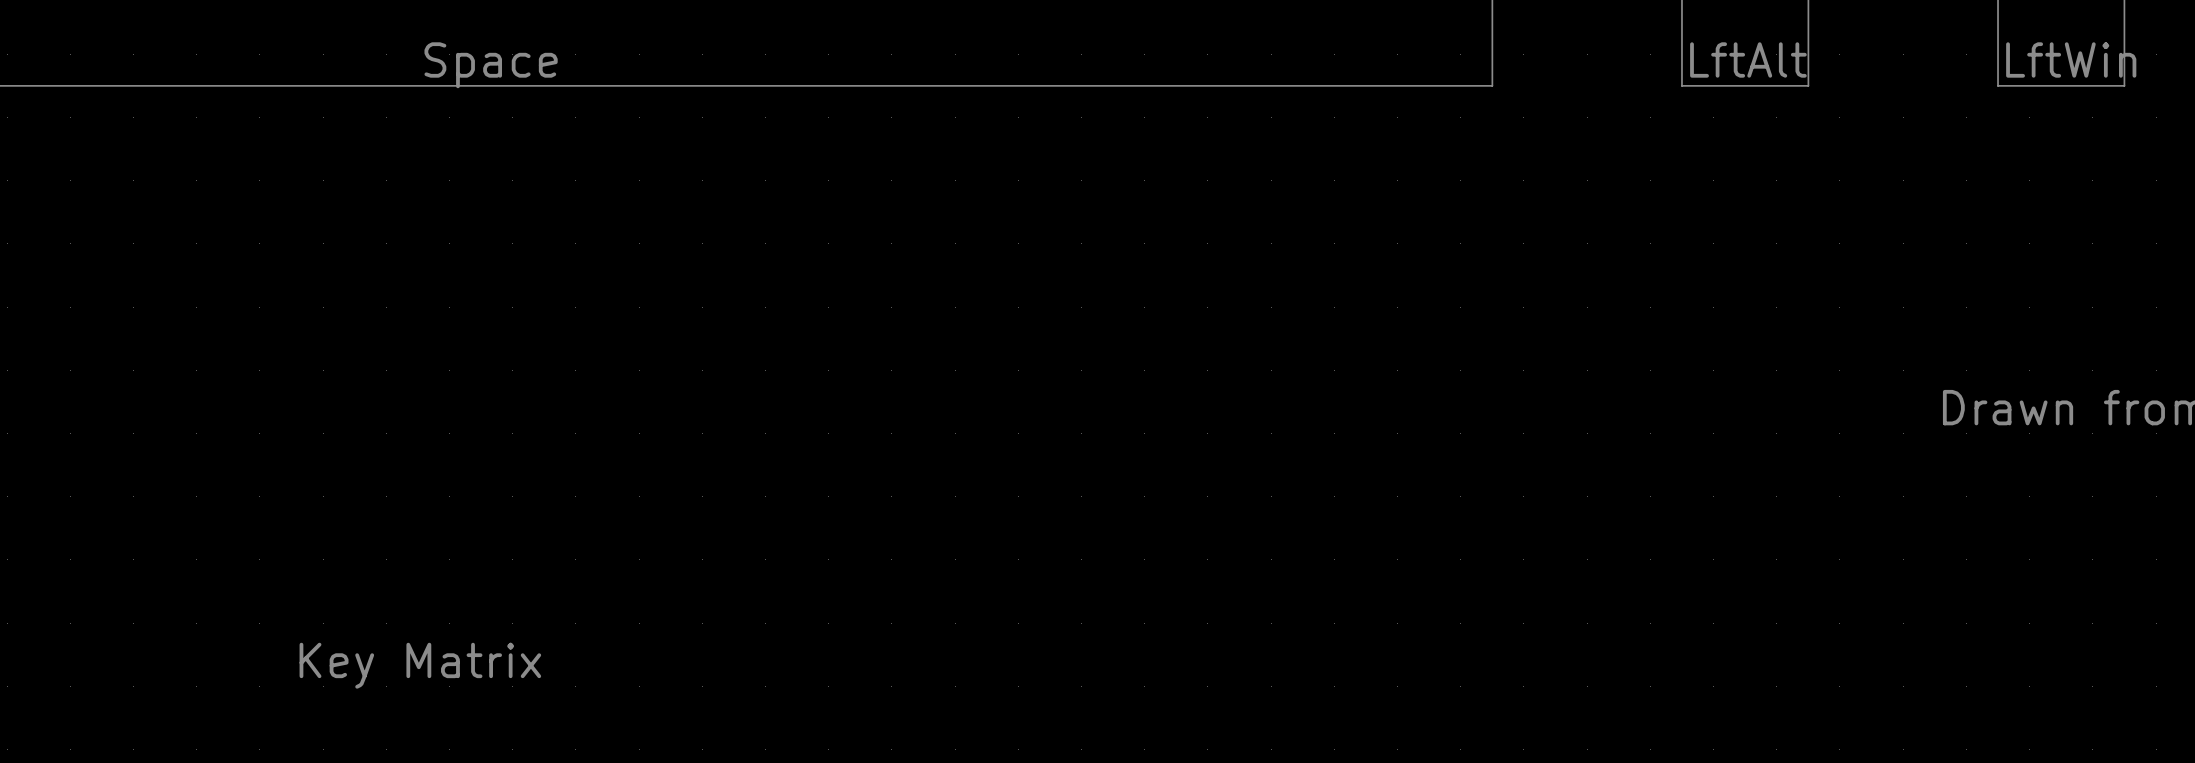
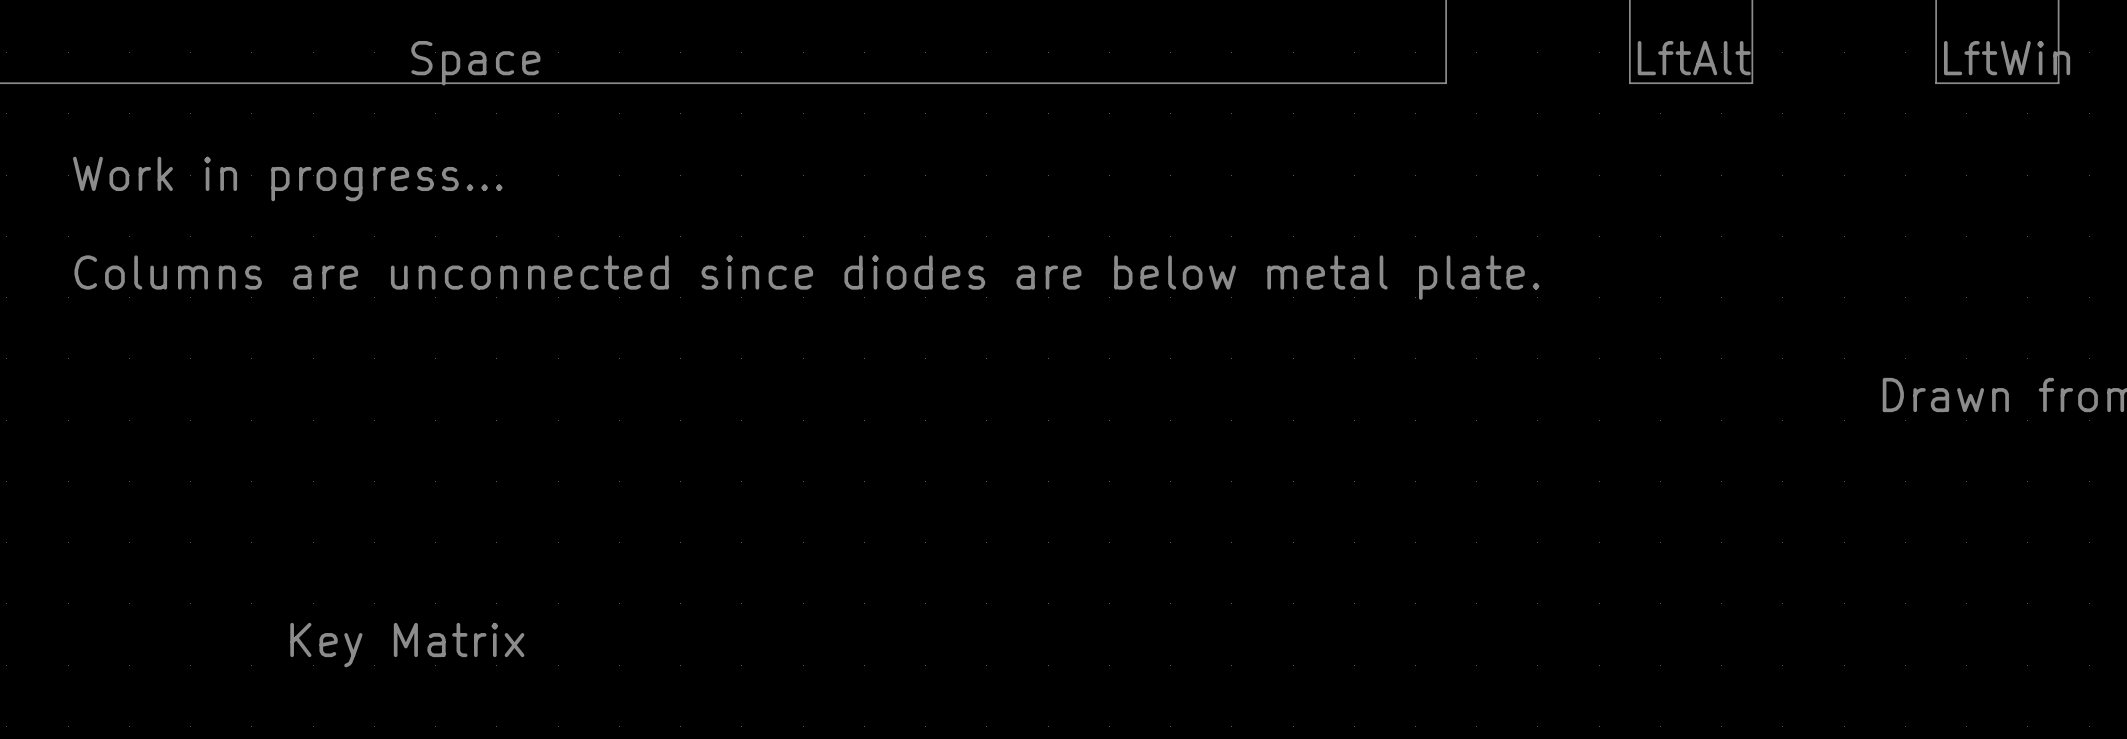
text: none -> Work in progress... (287, 178)
text: none -> Columns are unconnected since diodes are below metal plate. (806, 277)

